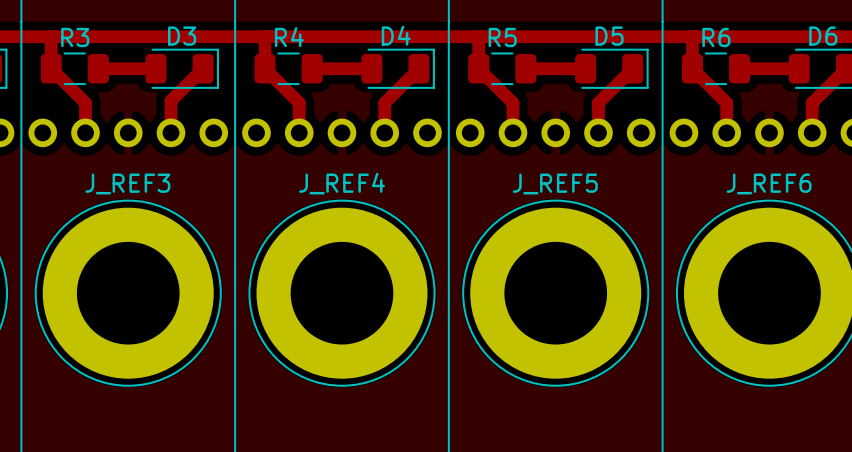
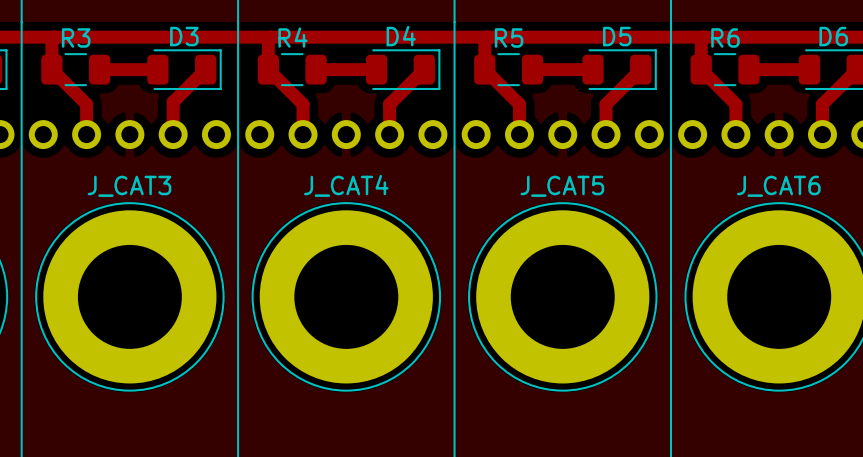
J_REF3 name: J_REF3 (127, 183) -> J_CAT3 (129, 186)
J_REF4 name: J_REF4 (341, 183) -> J_CAT4 (346, 185)
J_REF5 name: J_REF5 (555, 183) -> J_CAT5 (562, 186)
J_REF6 name: J_REF6 (769, 183) -> J_CAT6 (778, 186)

